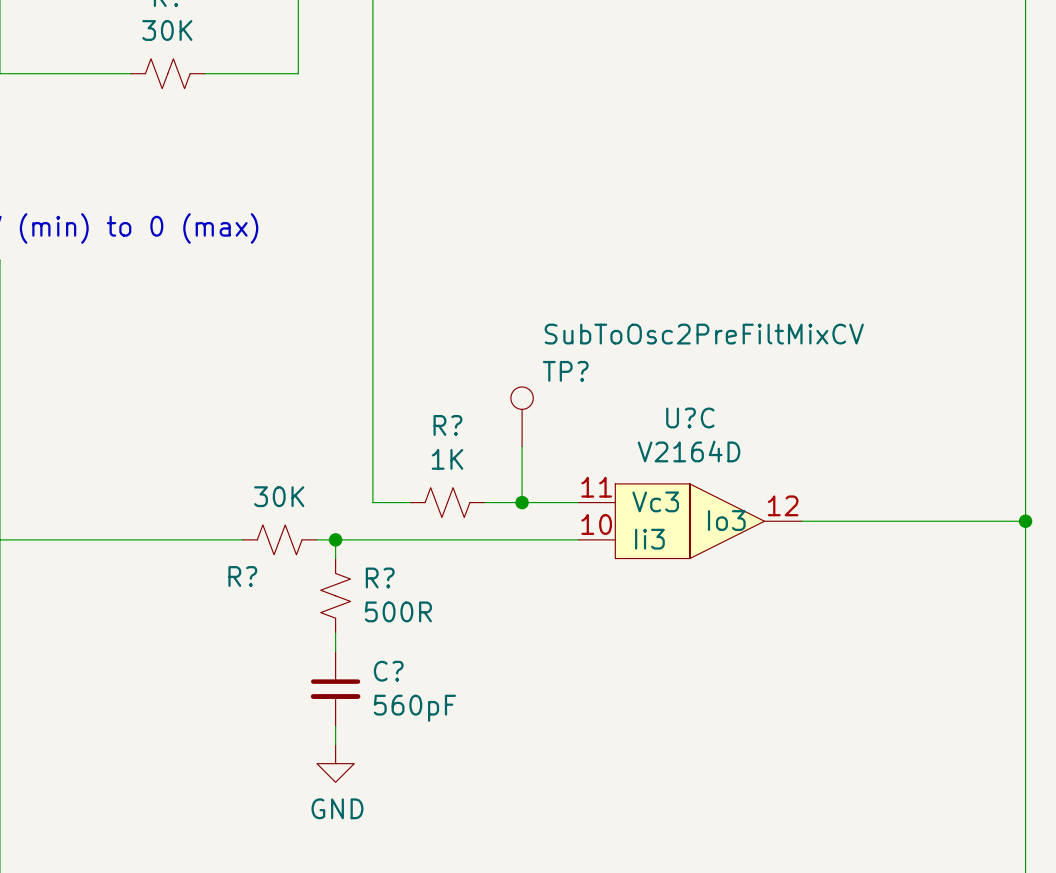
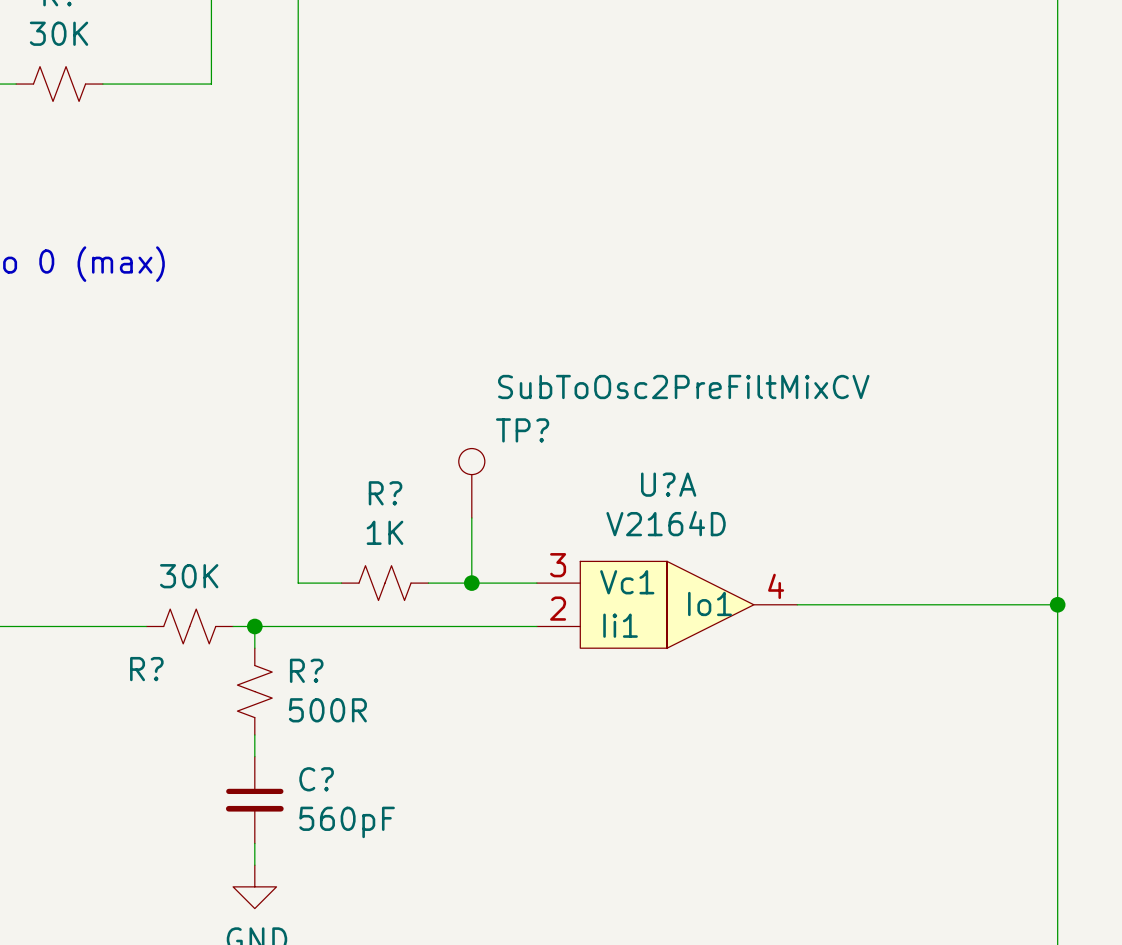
U?C name: U?C (690, 417) -> U?A (668, 484)
U?C pin number: 11 (596, 487) -> 3 (558, 565)
U?C pin name: Vc3 (655, 501) -> Vc1 (627, 582)
U?C pin number: 12 (783, 505) -> 4 (776, 586)
U?C pin name: Io3 (726, 520) -> Io1 (710, 603)
U?C pin number: 10 (596, 524) -> 2 (558, 608)
U?C pin name: Ii3 (649, 539) -> Ii1 (620, 625)

